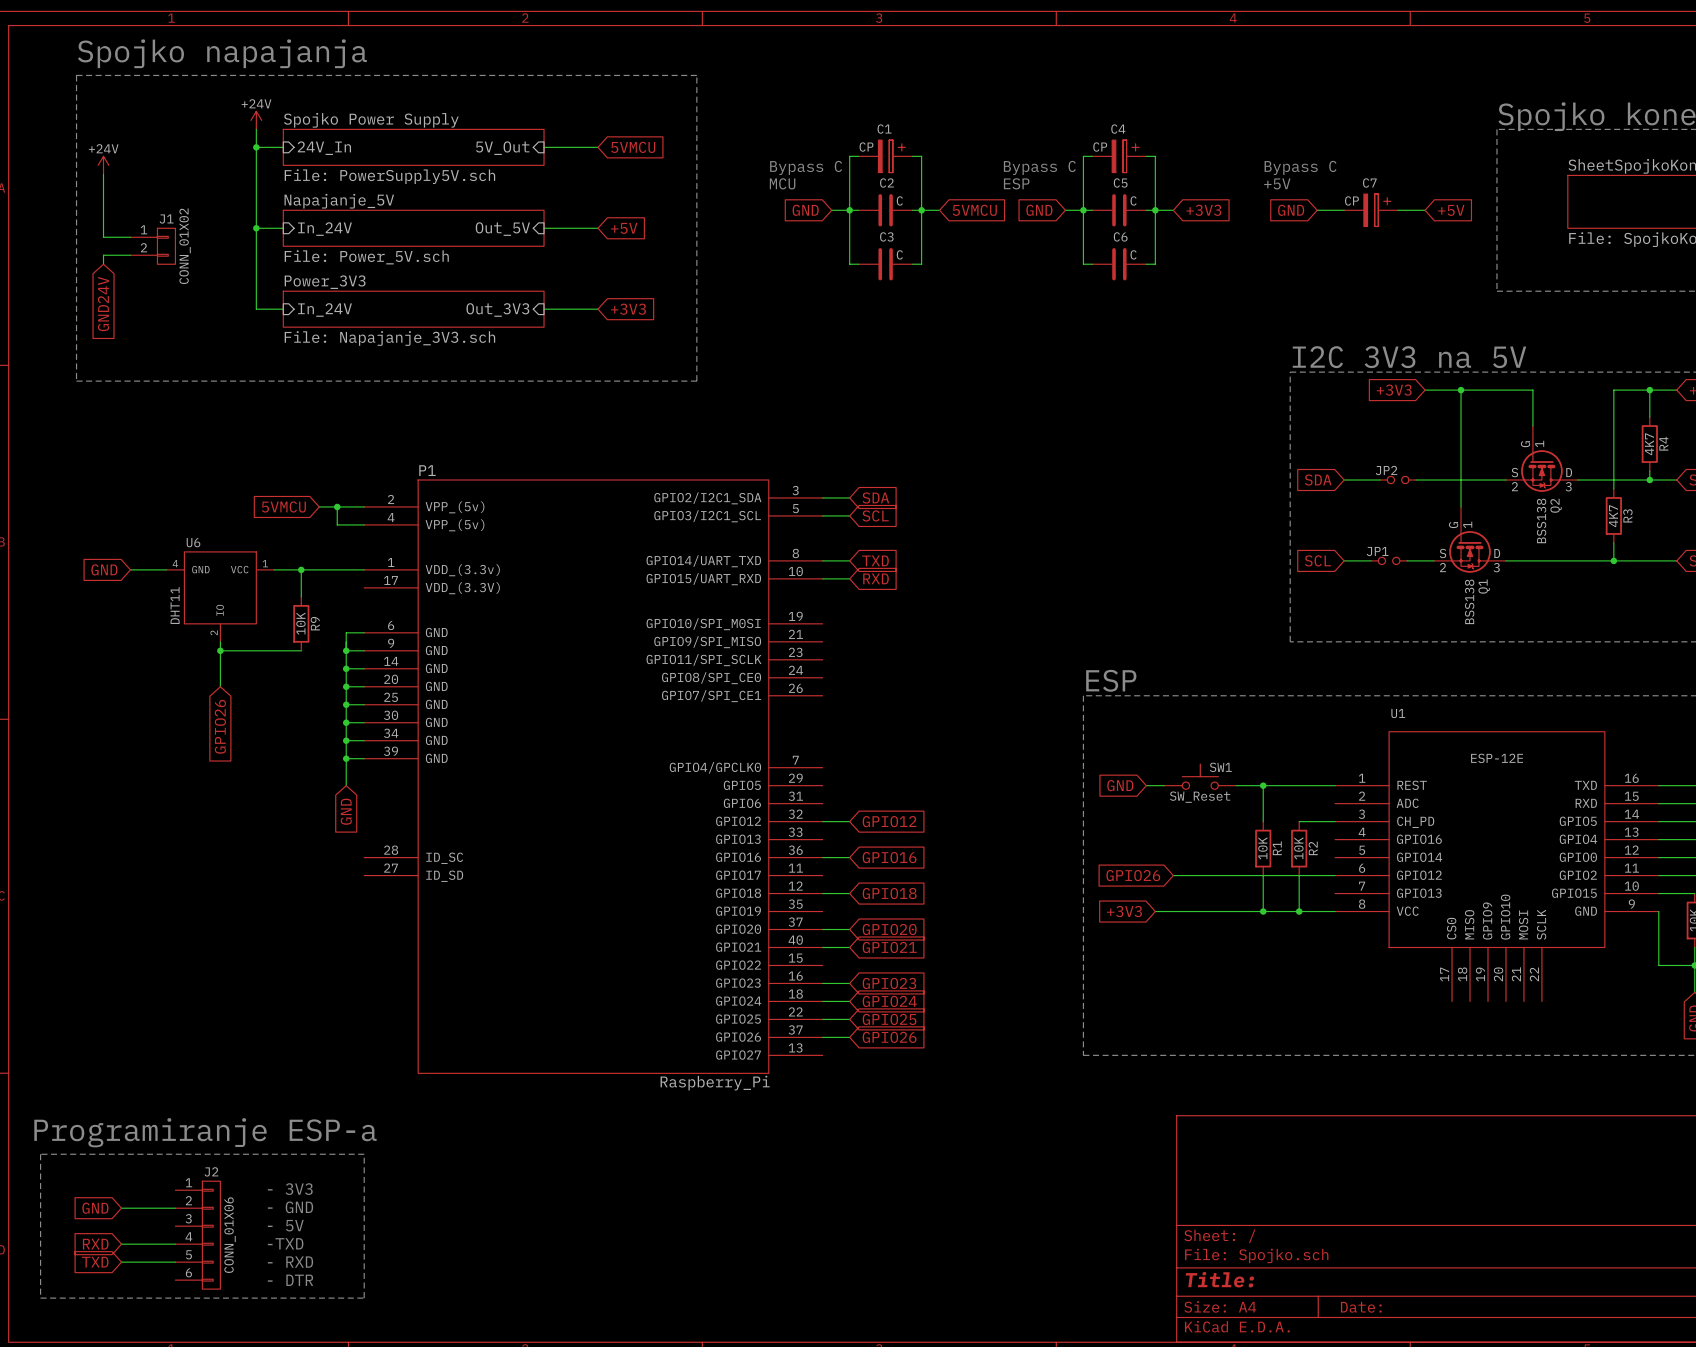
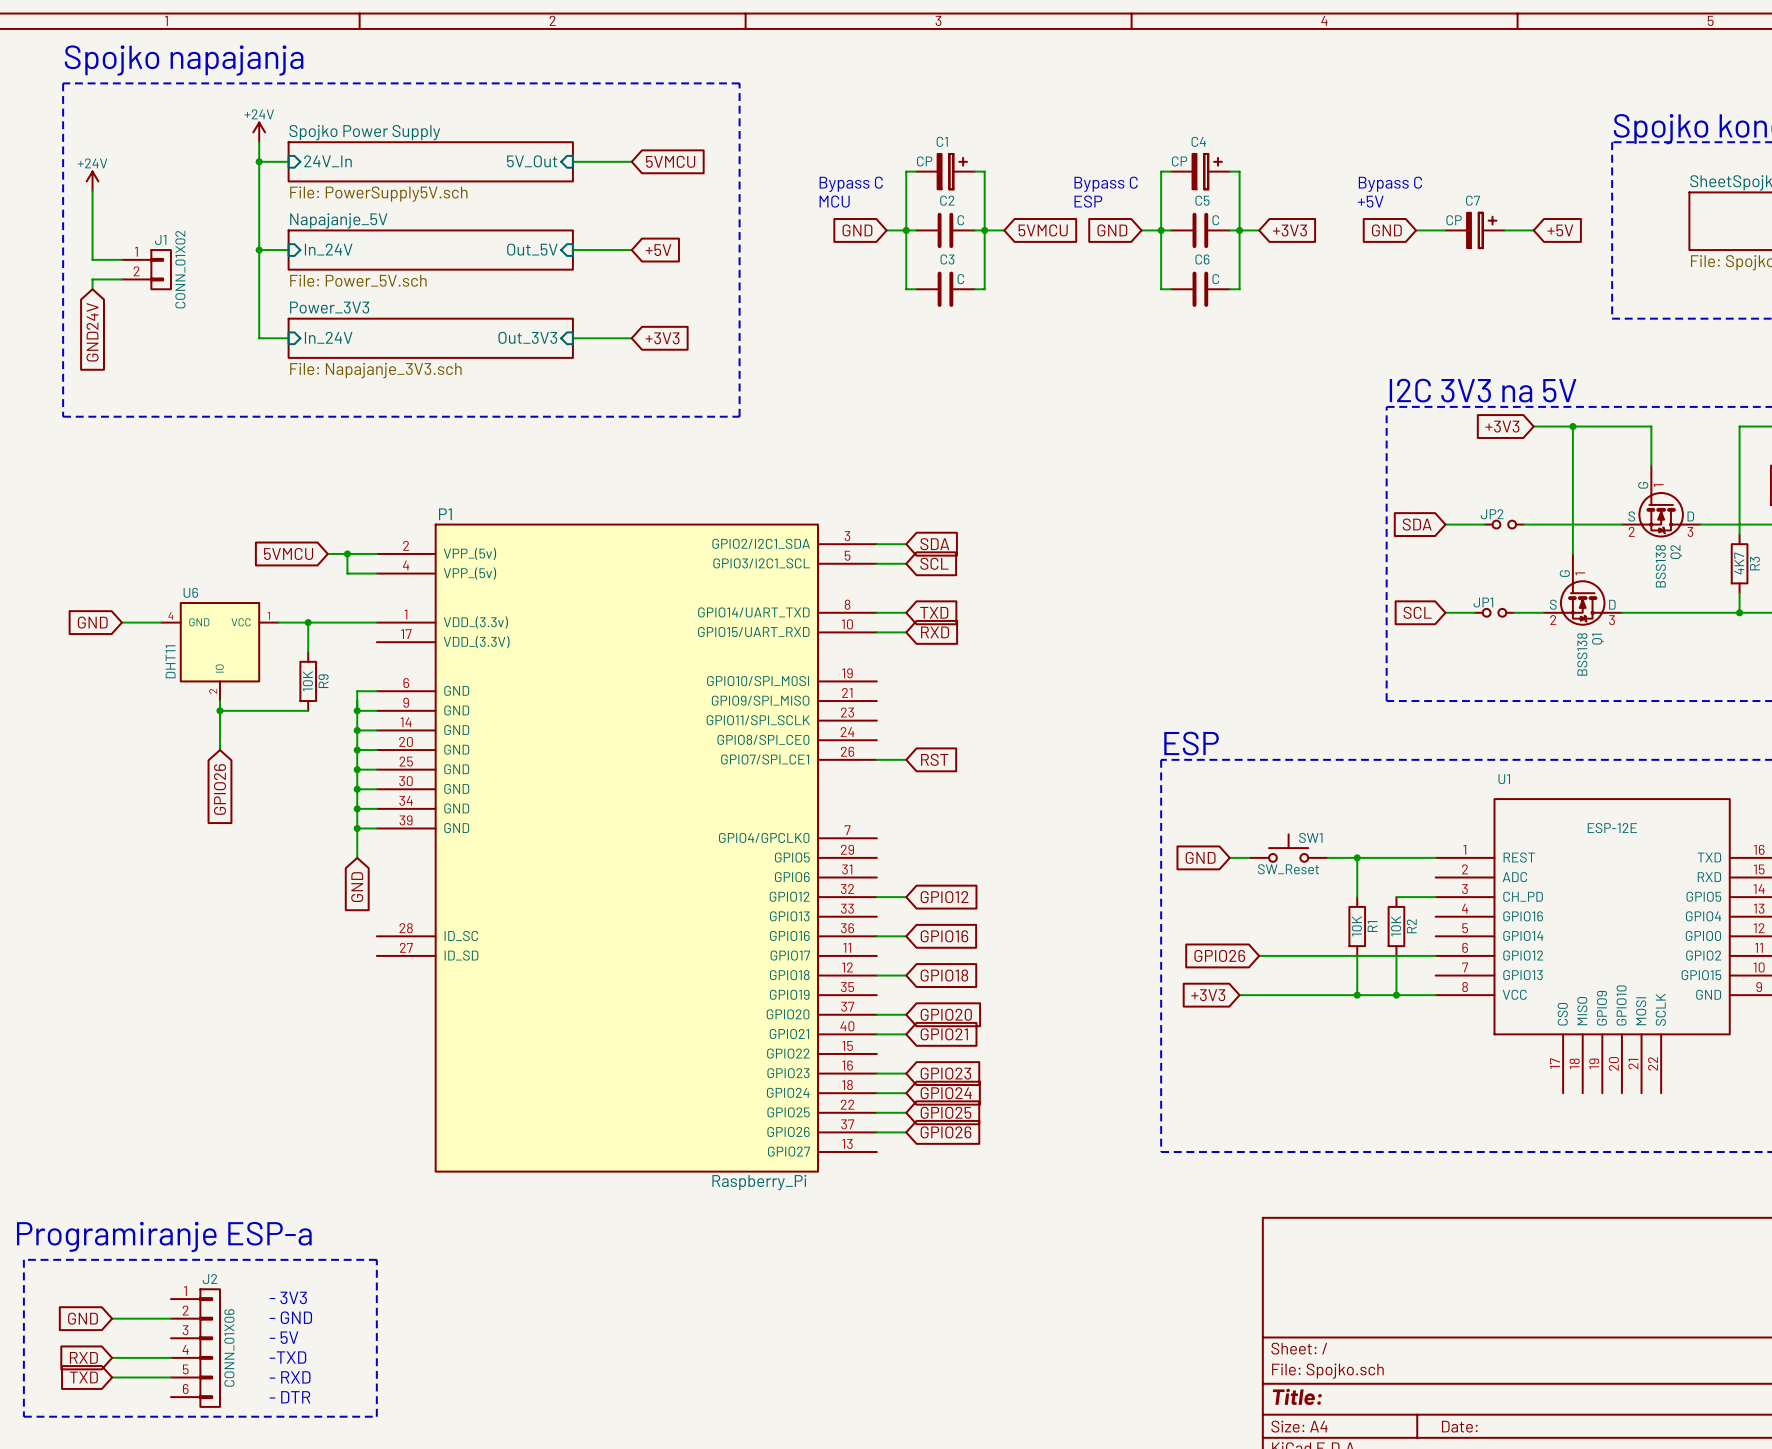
wire: none -> (876, 759) (906, 759)
global label: none -> RST (934, 759)

